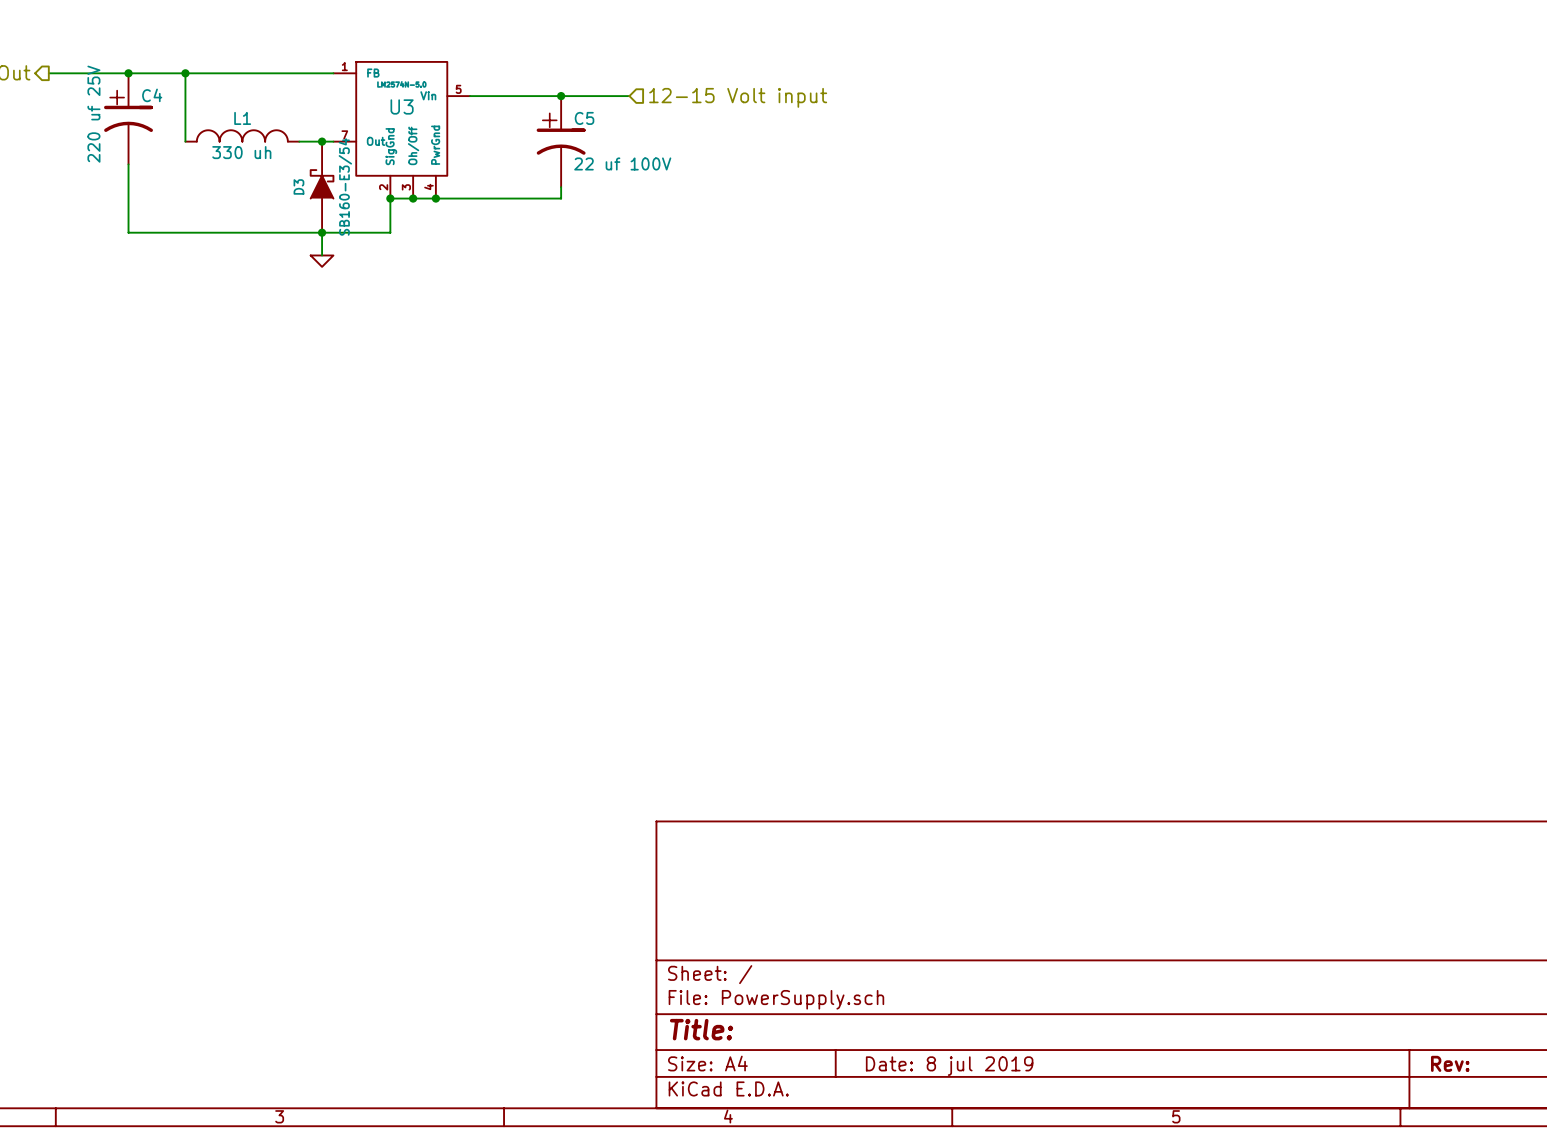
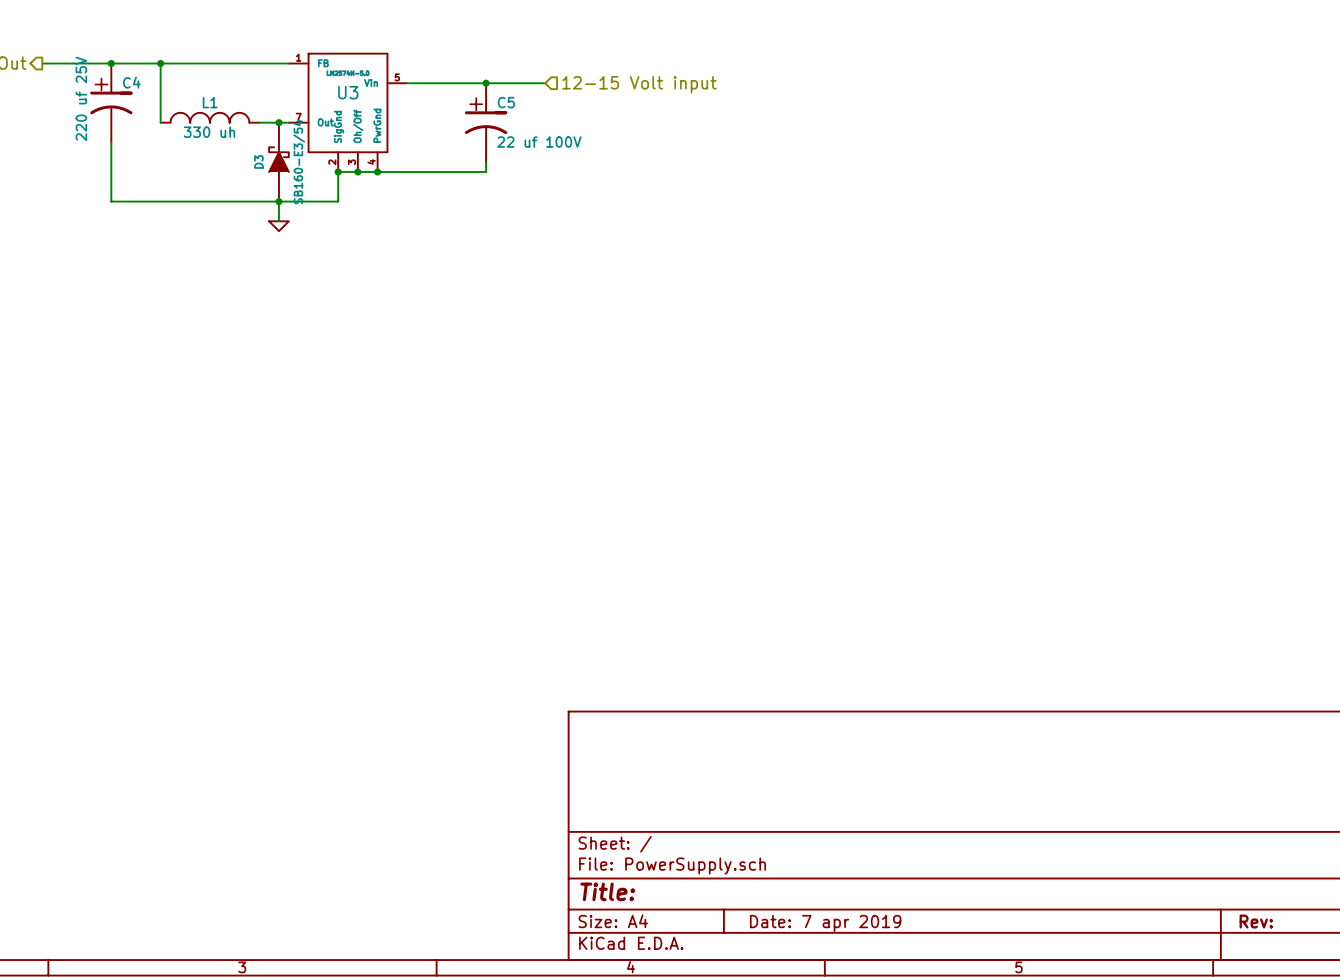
title block: Date: 8 jul 2019 (949, 1066) -> Date: 7 apr 2019 (825, 923)

